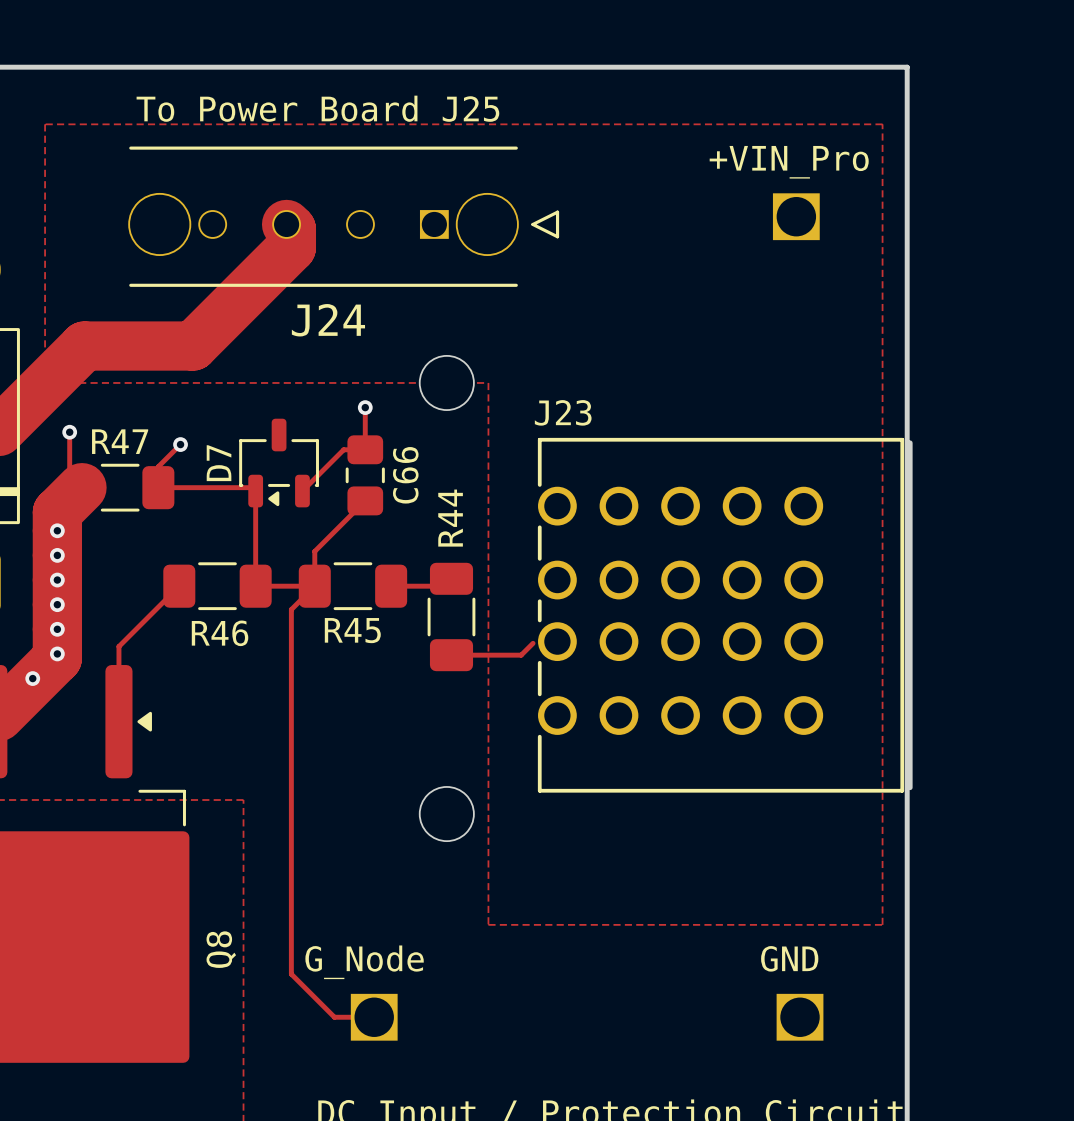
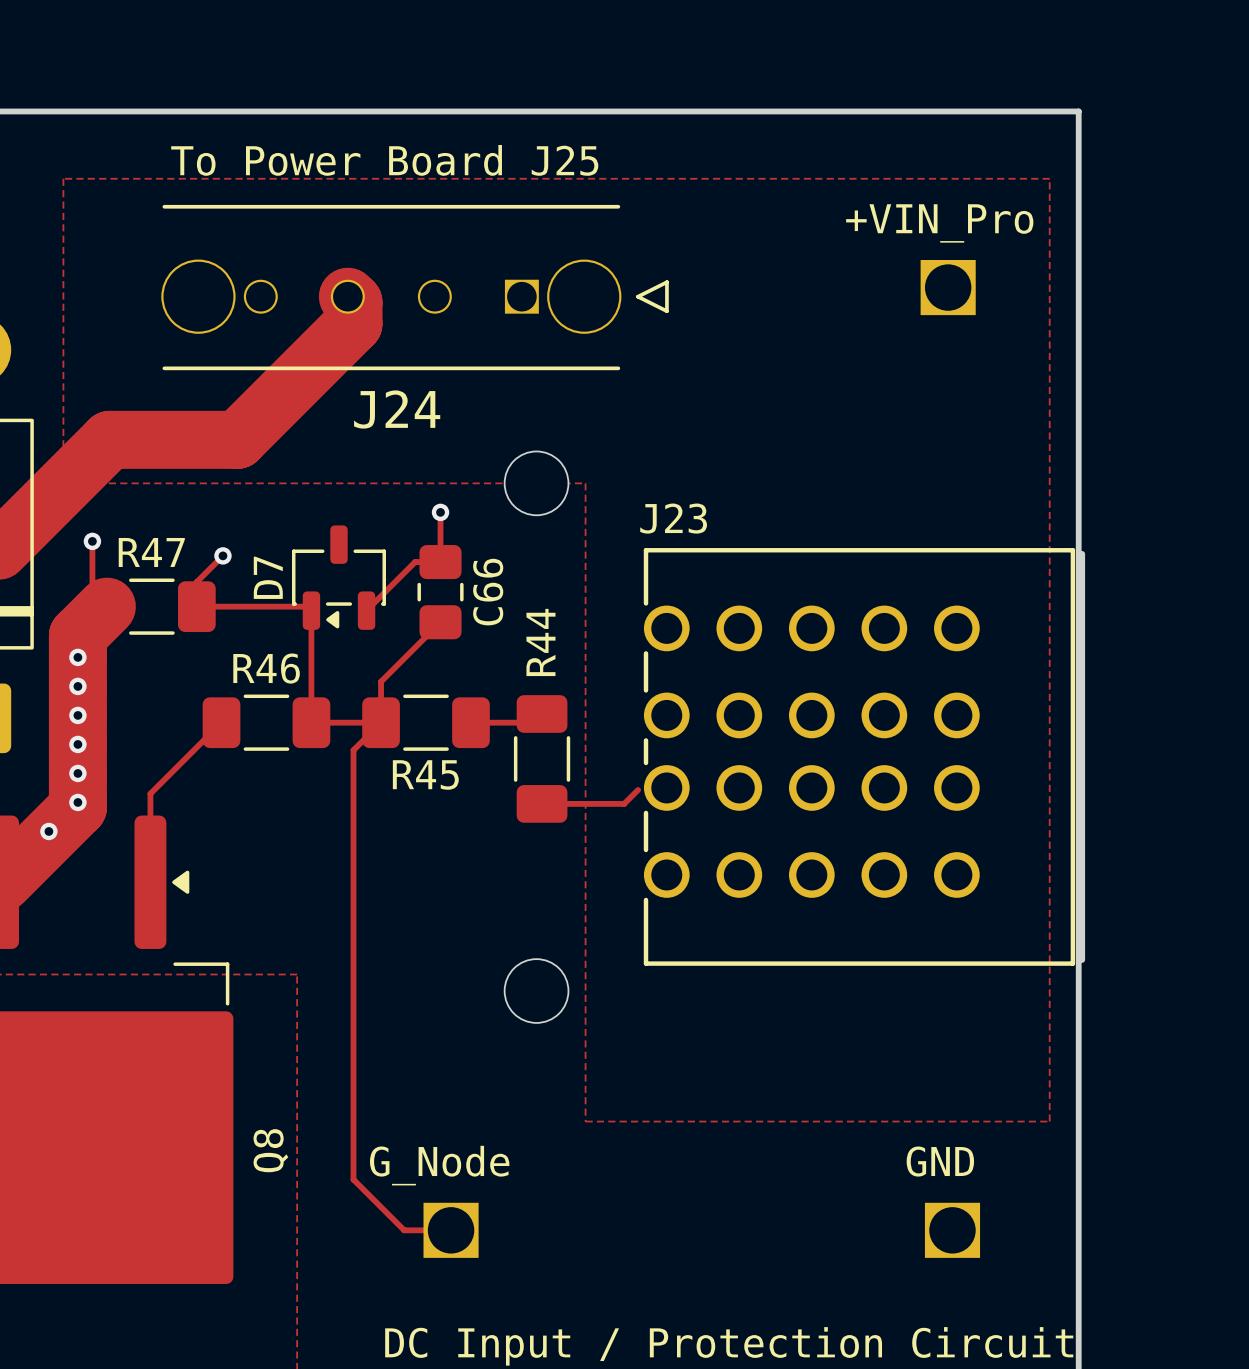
R46 name position: R46 (220, 633) -> R46 (266, 668)

